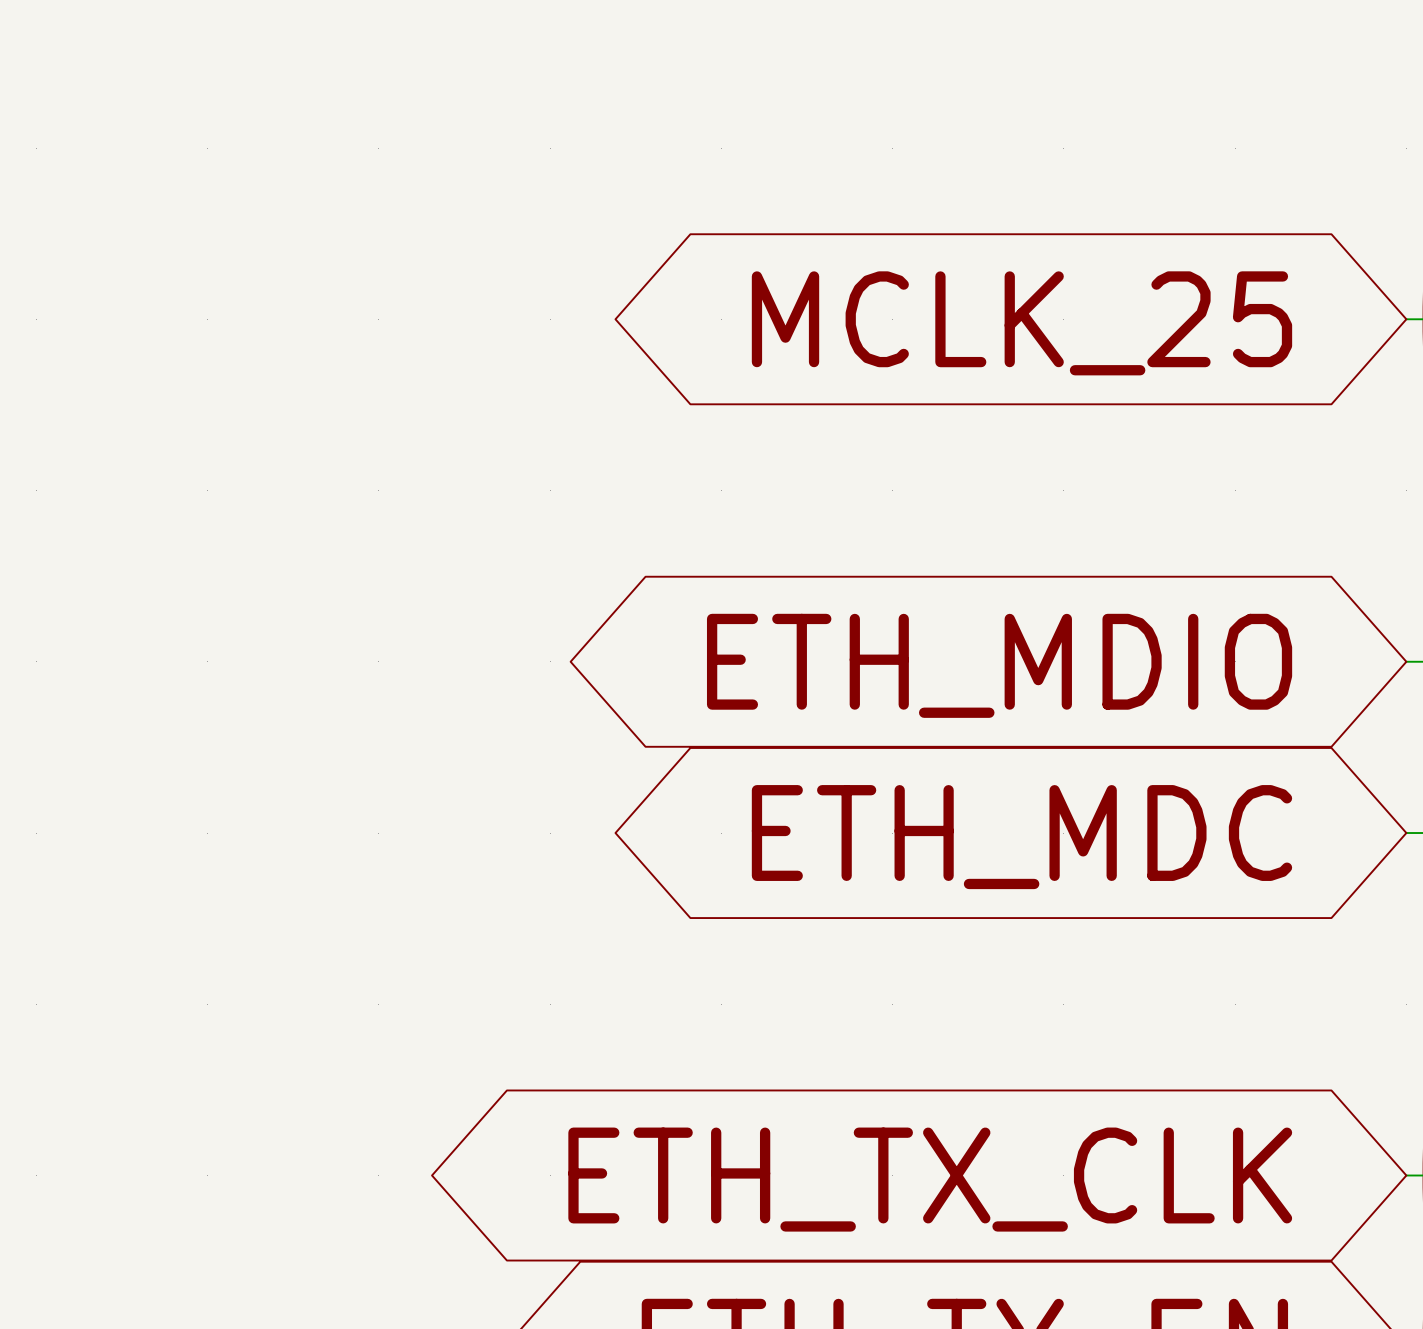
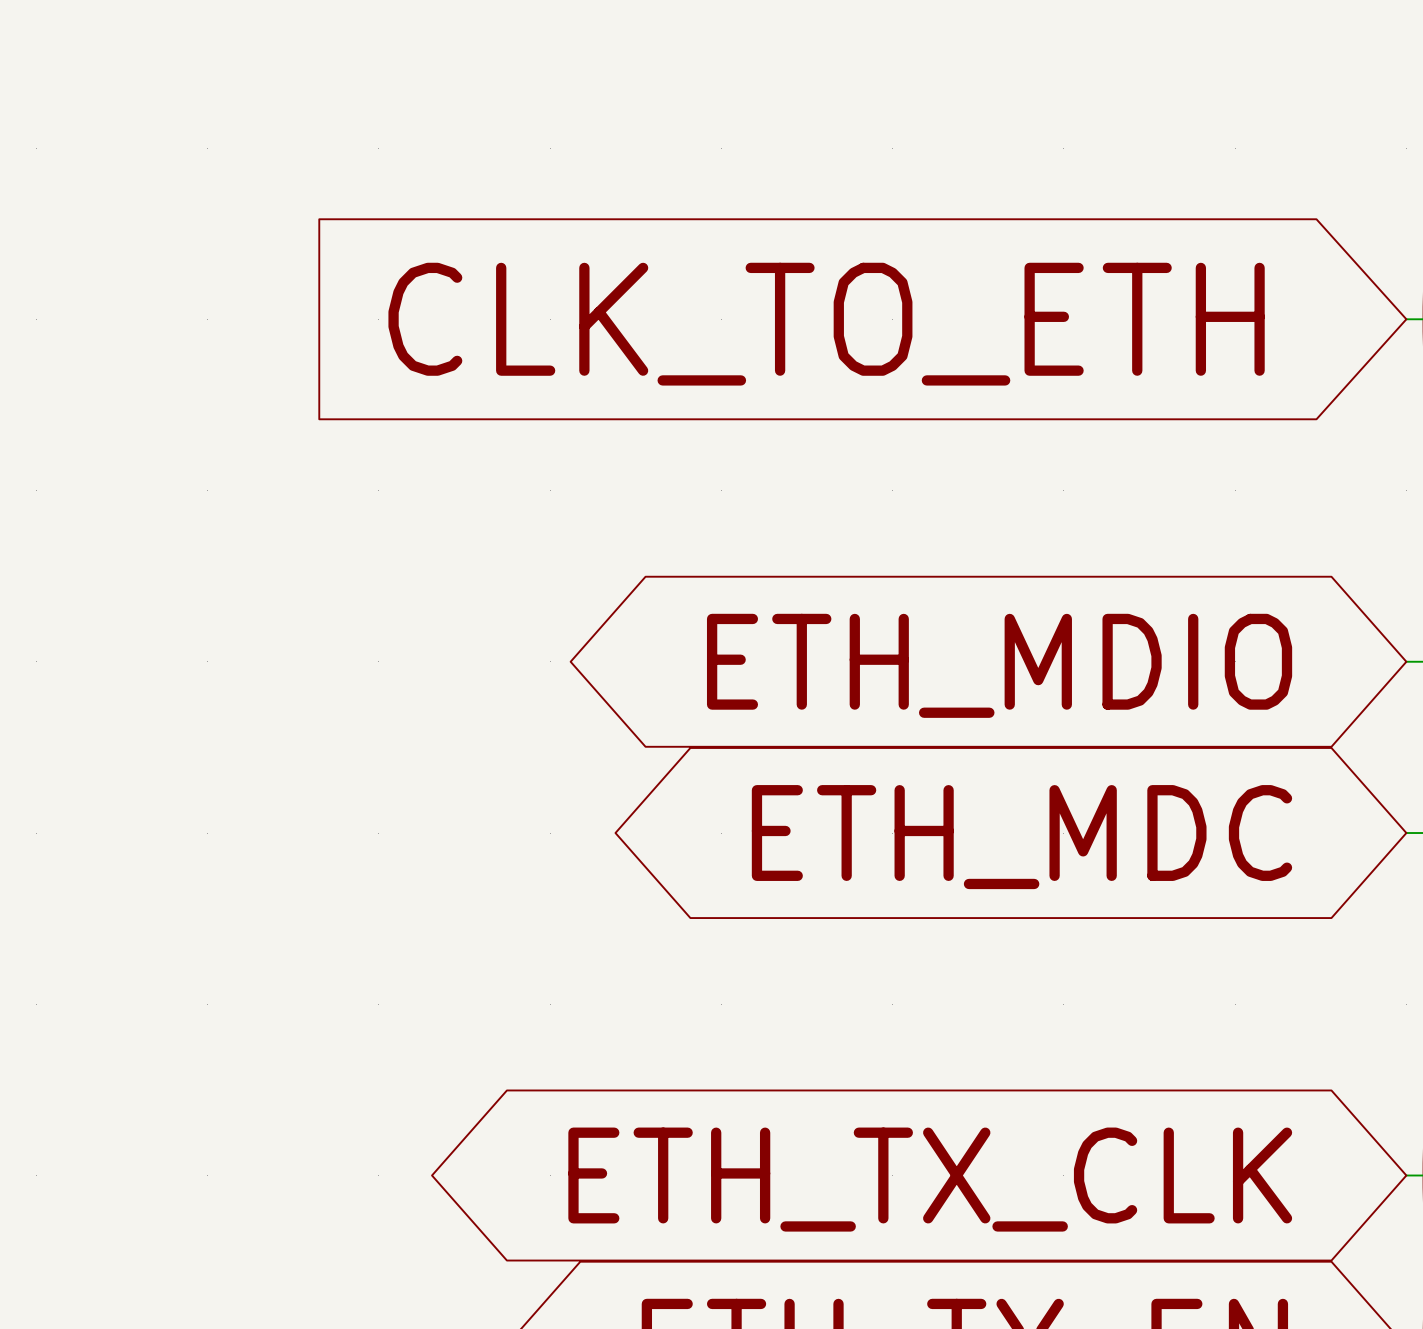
global label shape: bidirectional (1021, 323) -> input (826, 324)
global label: MCLK_25 (1021, 323) -> CLK_TO_ETH (826, 324)

